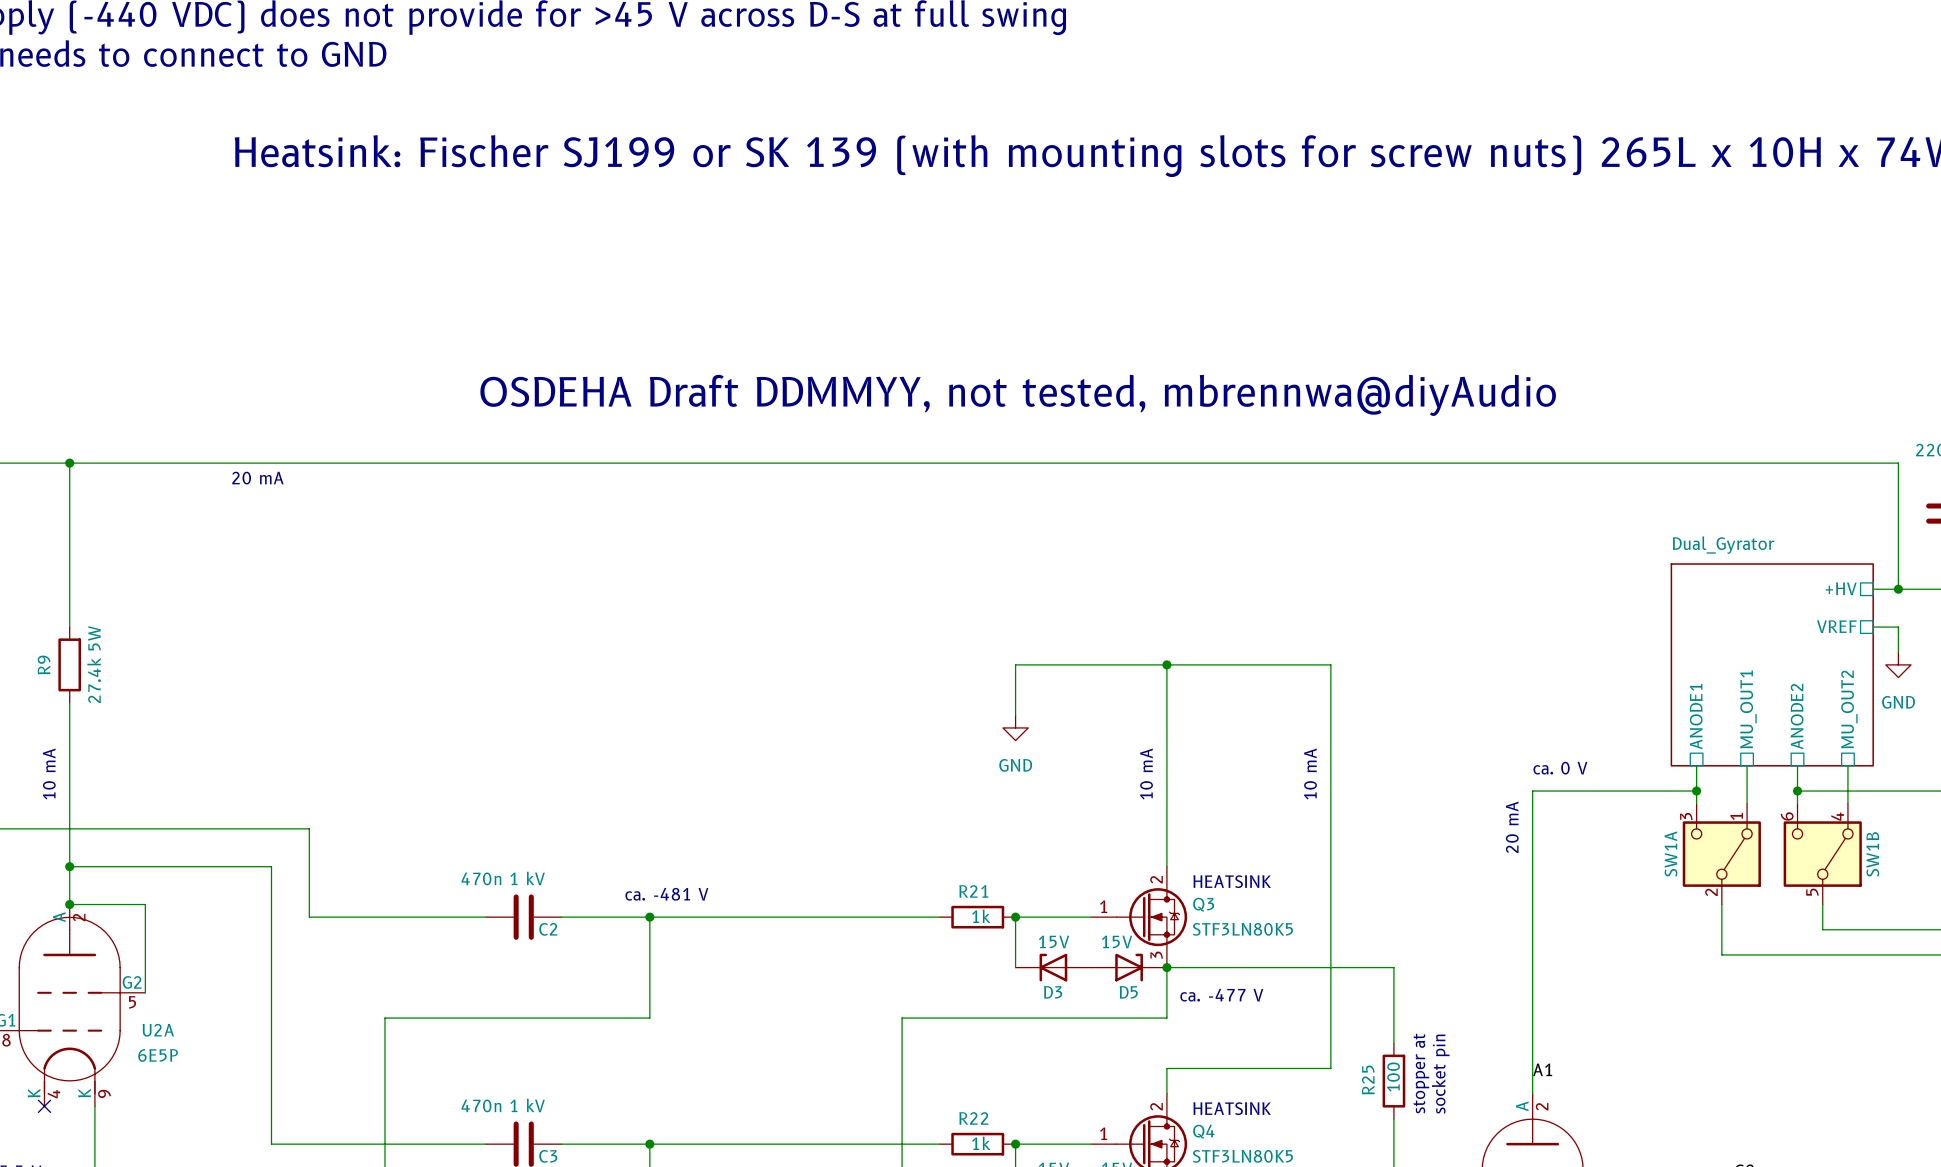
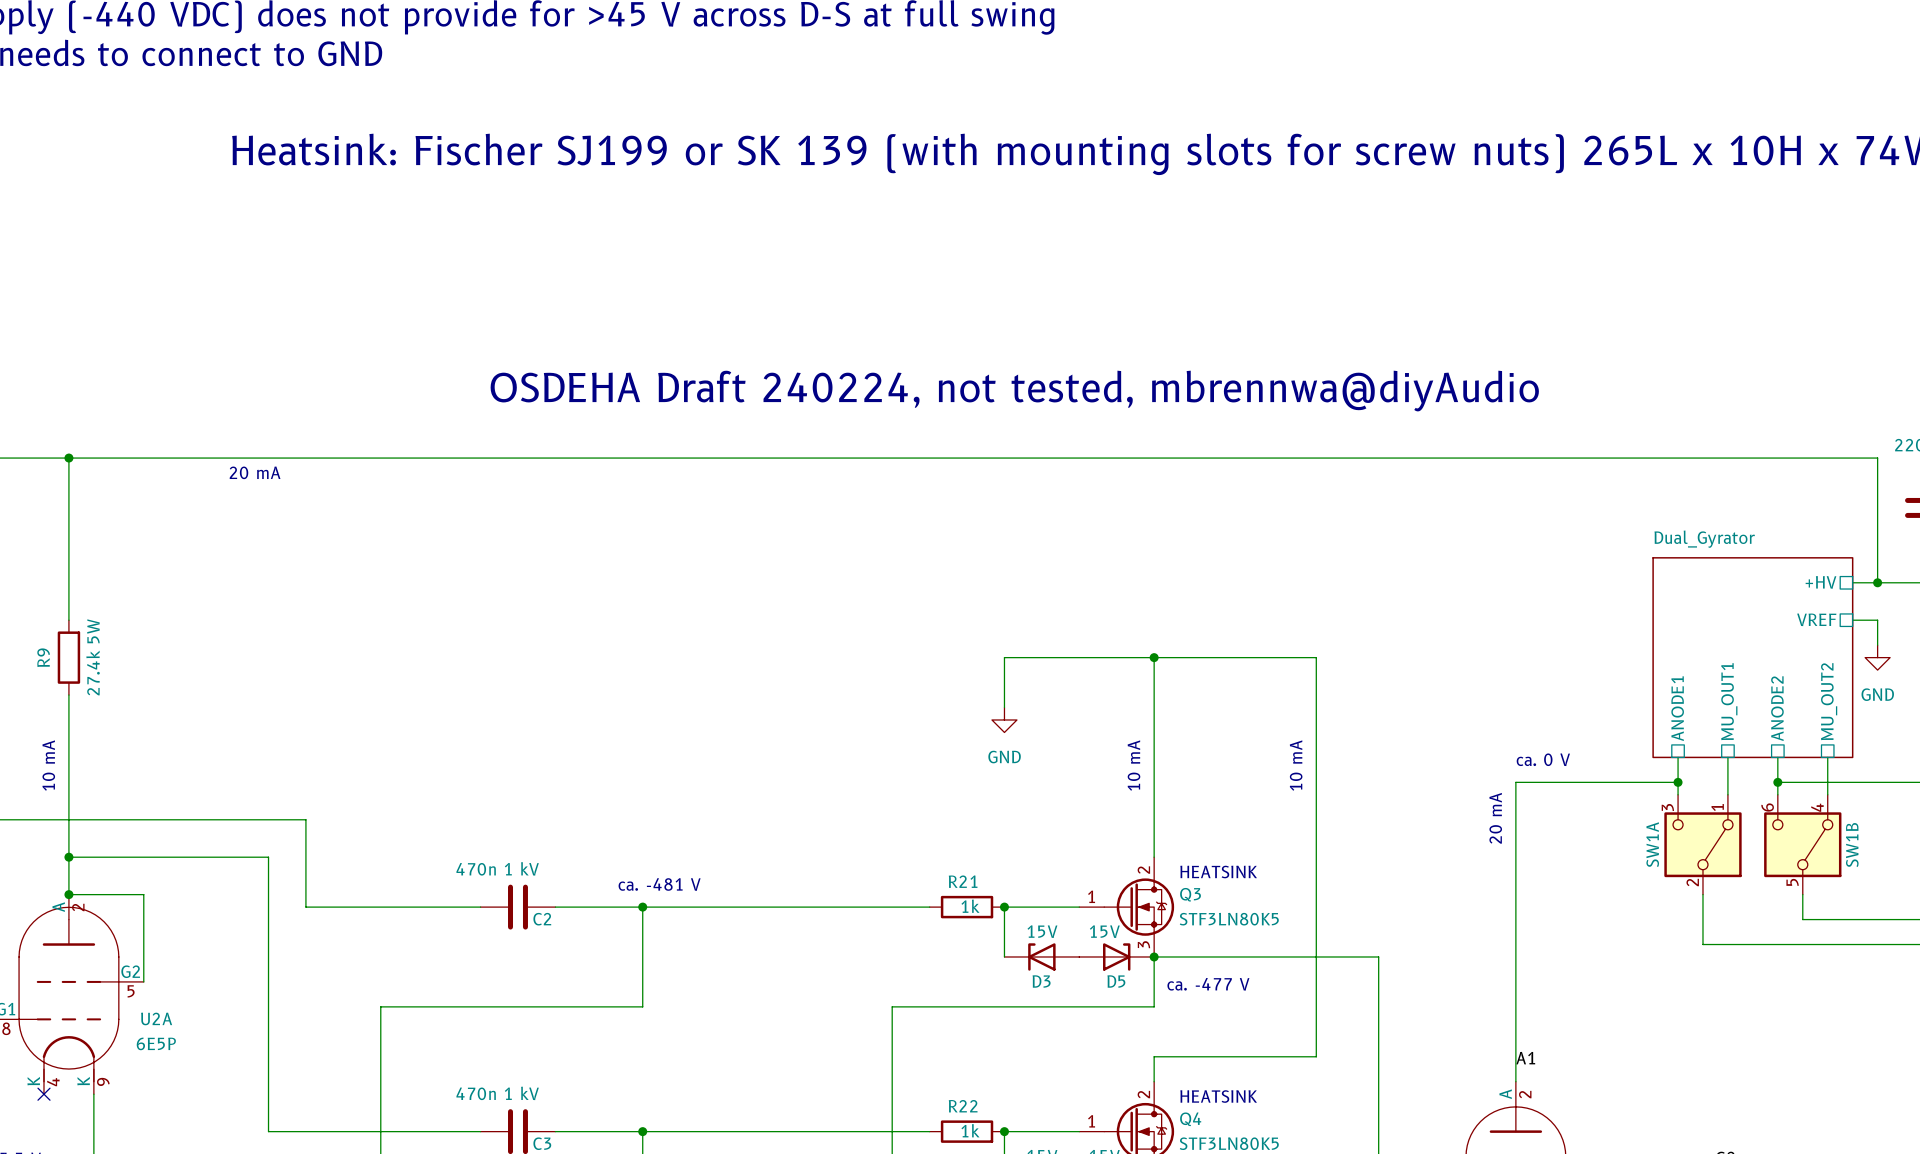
text: OSDEHA Draft DDMMYY, not tested, mbrennwa@diyAudio (1018, 395) -> OSDEHA Draft 240224, not tested, mbrennwa@diyAudio (1014, 391)
wire: none -> (1378, 1031) (1378, 1106)
text: stopper at (1421, 1073) -> none
text: socket pin (1440, 1074) -> none
R25: 100 (1393, 1081) -> none

